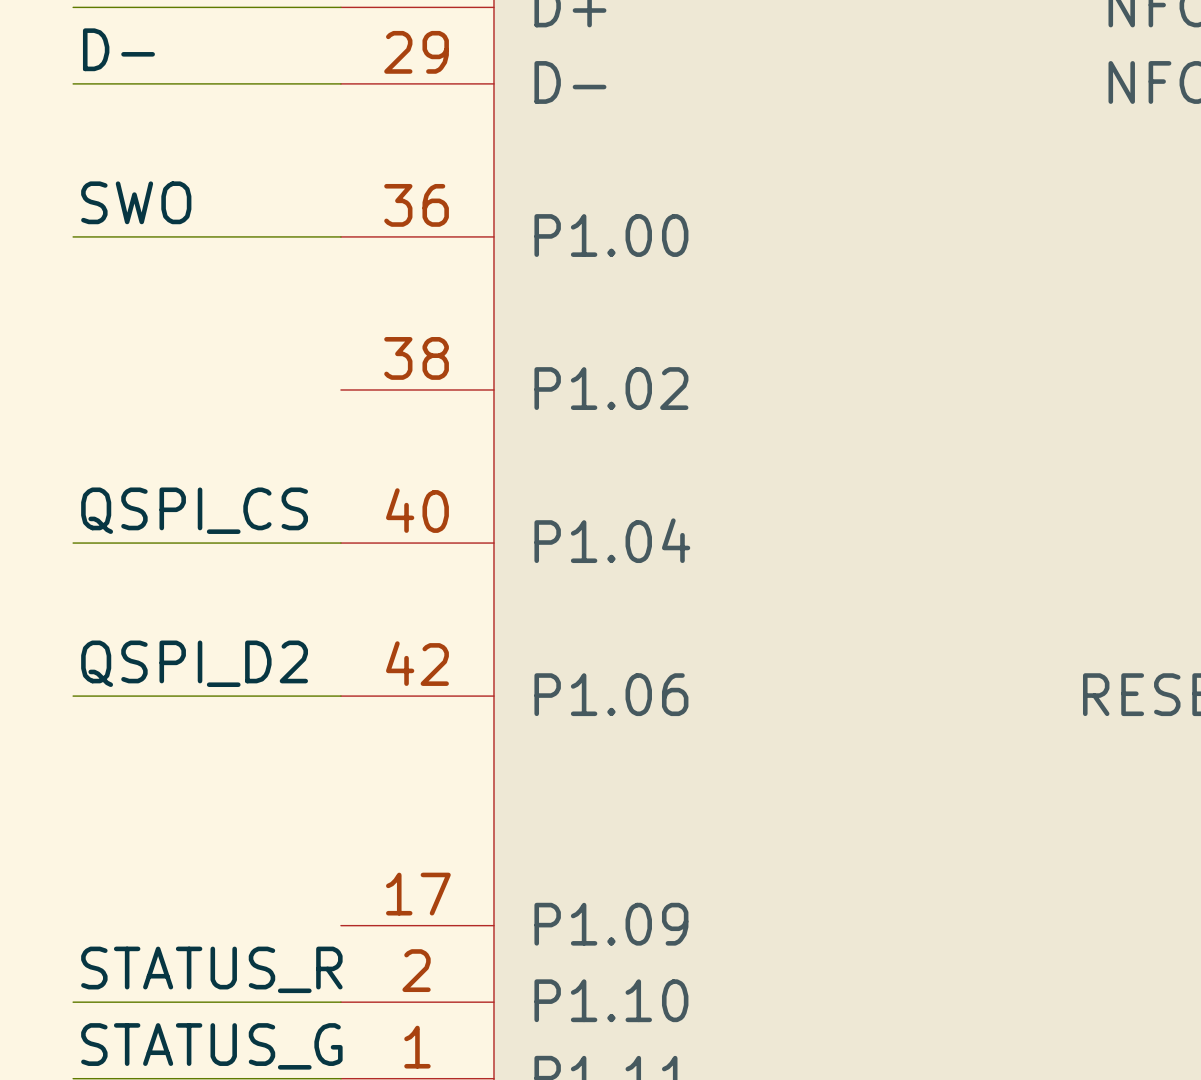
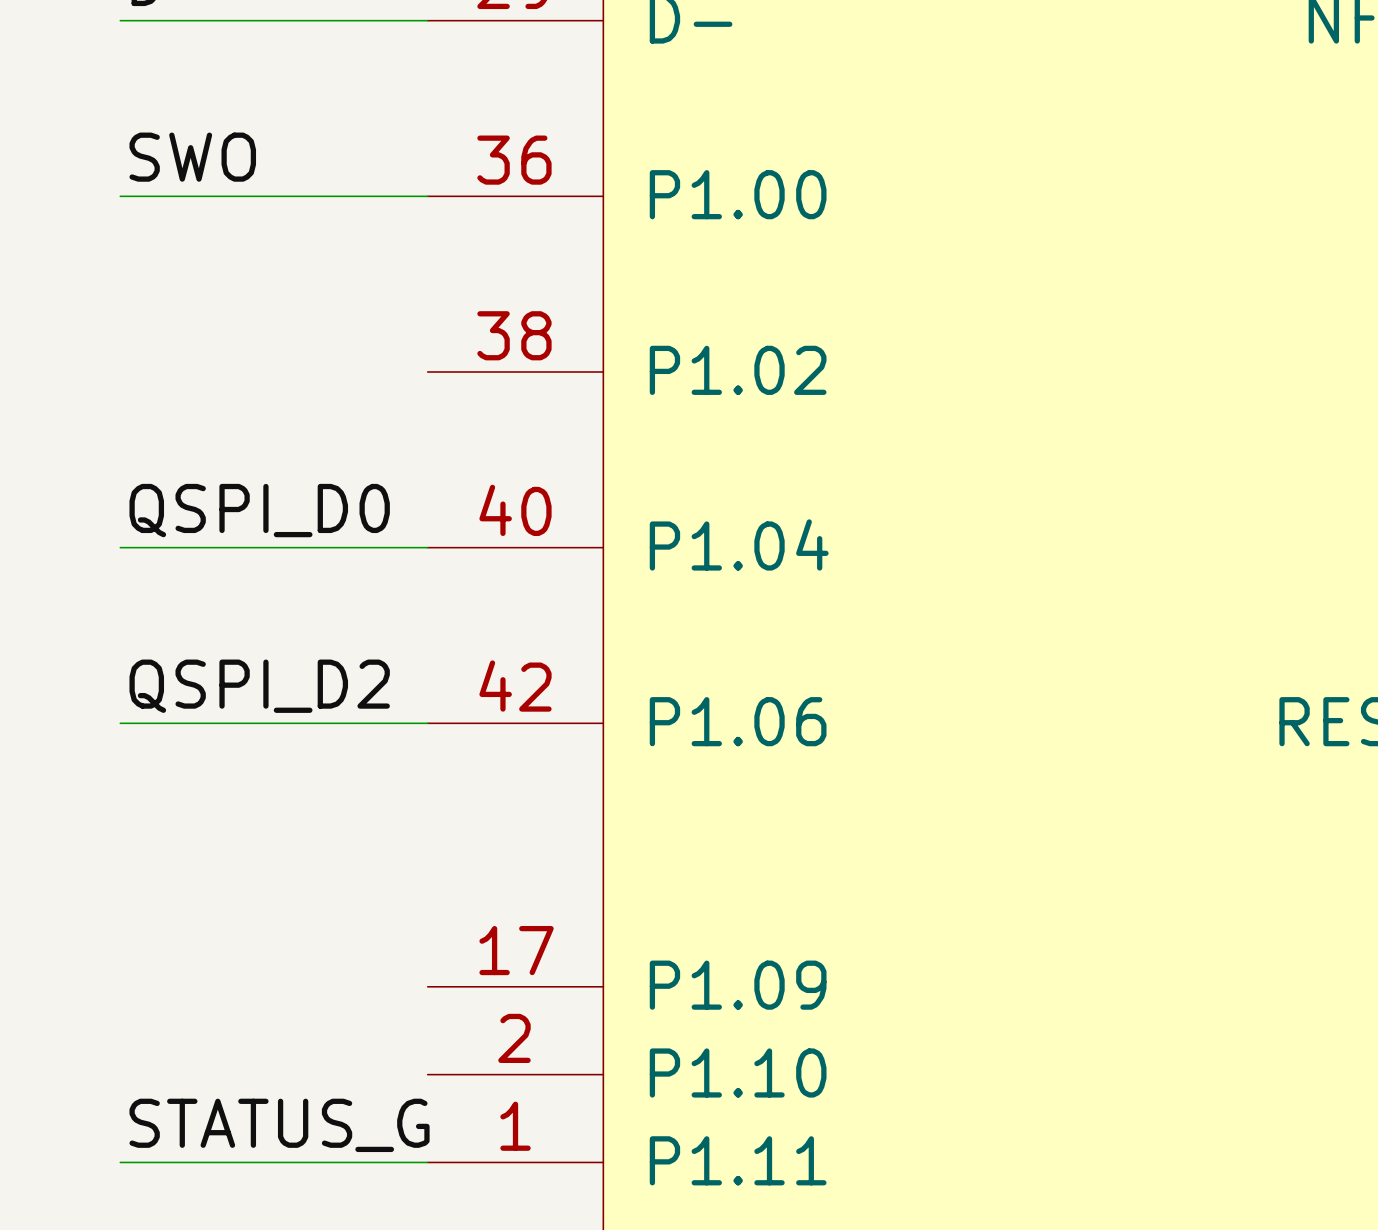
label: QSPI_CS (194, 510) -> QSPI_D0 (259, 510)
label: STATUS_R (211, 969) -> none
wire: (73, 1002) (340, 1002) -> none

